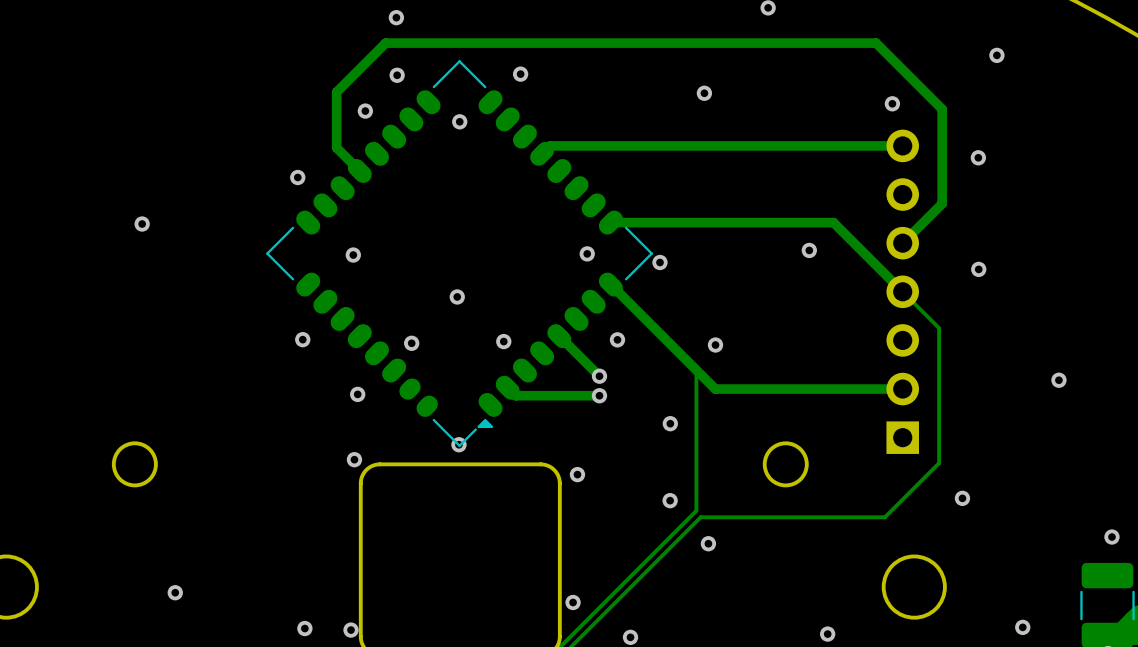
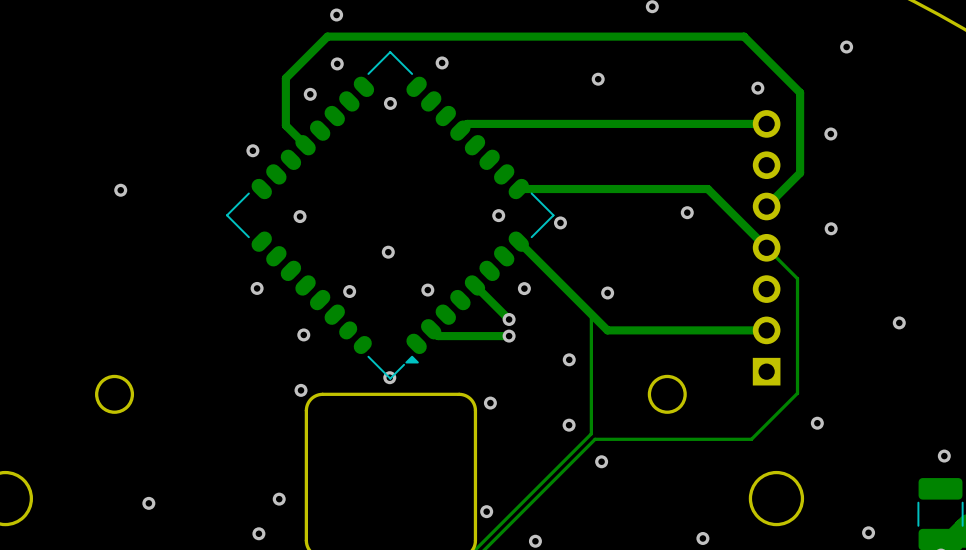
via position: (351, 630) -> (279, 499)

